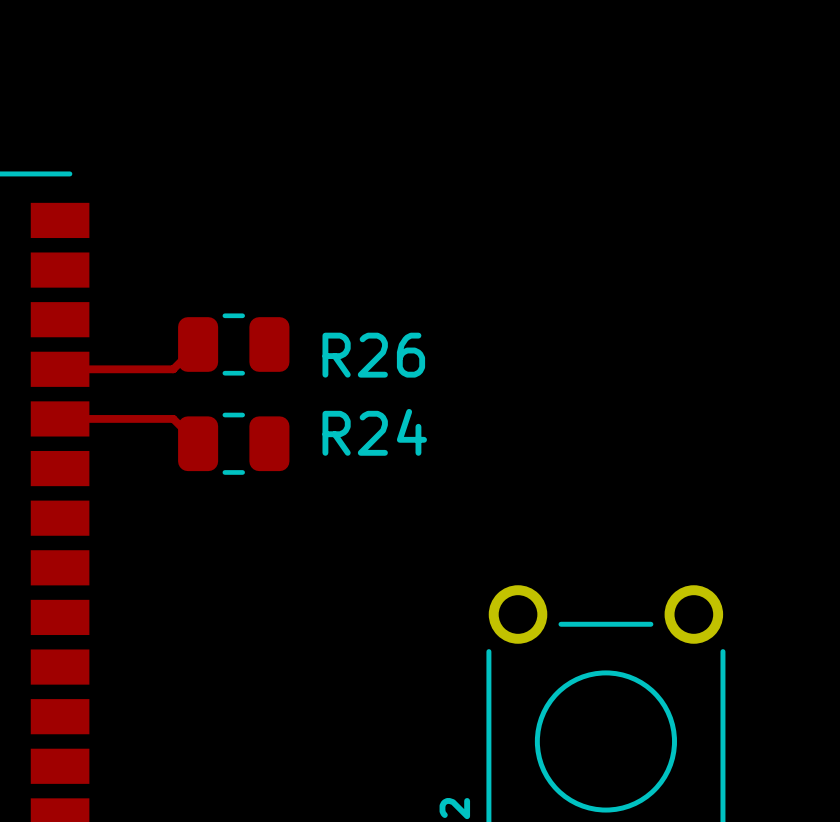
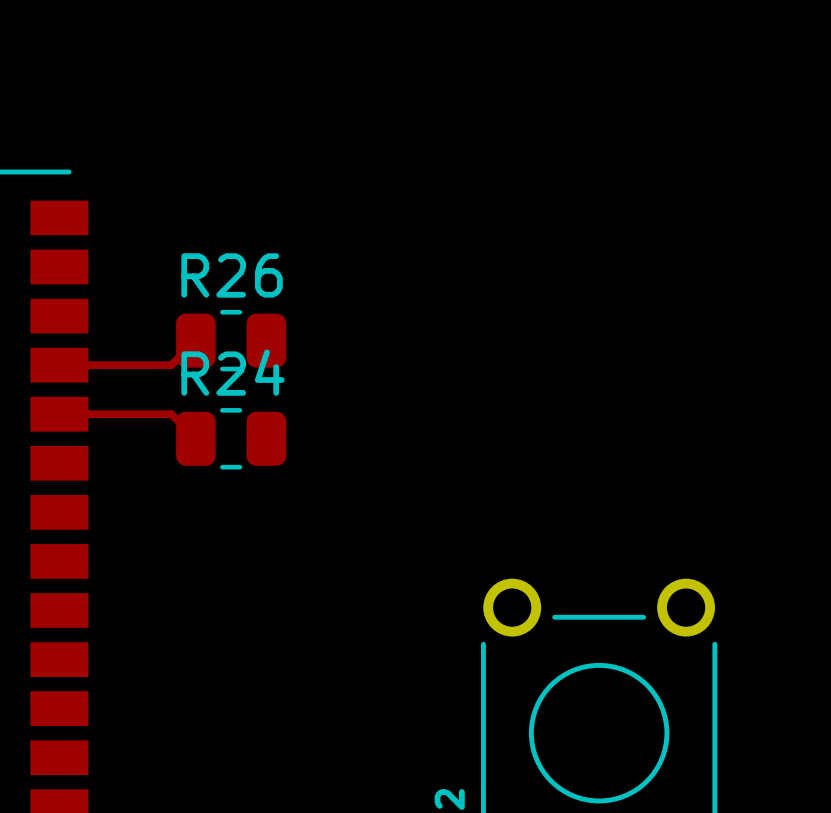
R26 name position: R26 (373, 355) -> R26 (232, 275)
R24 name position: R24 (374, 432) -> R24 (232, 372)

